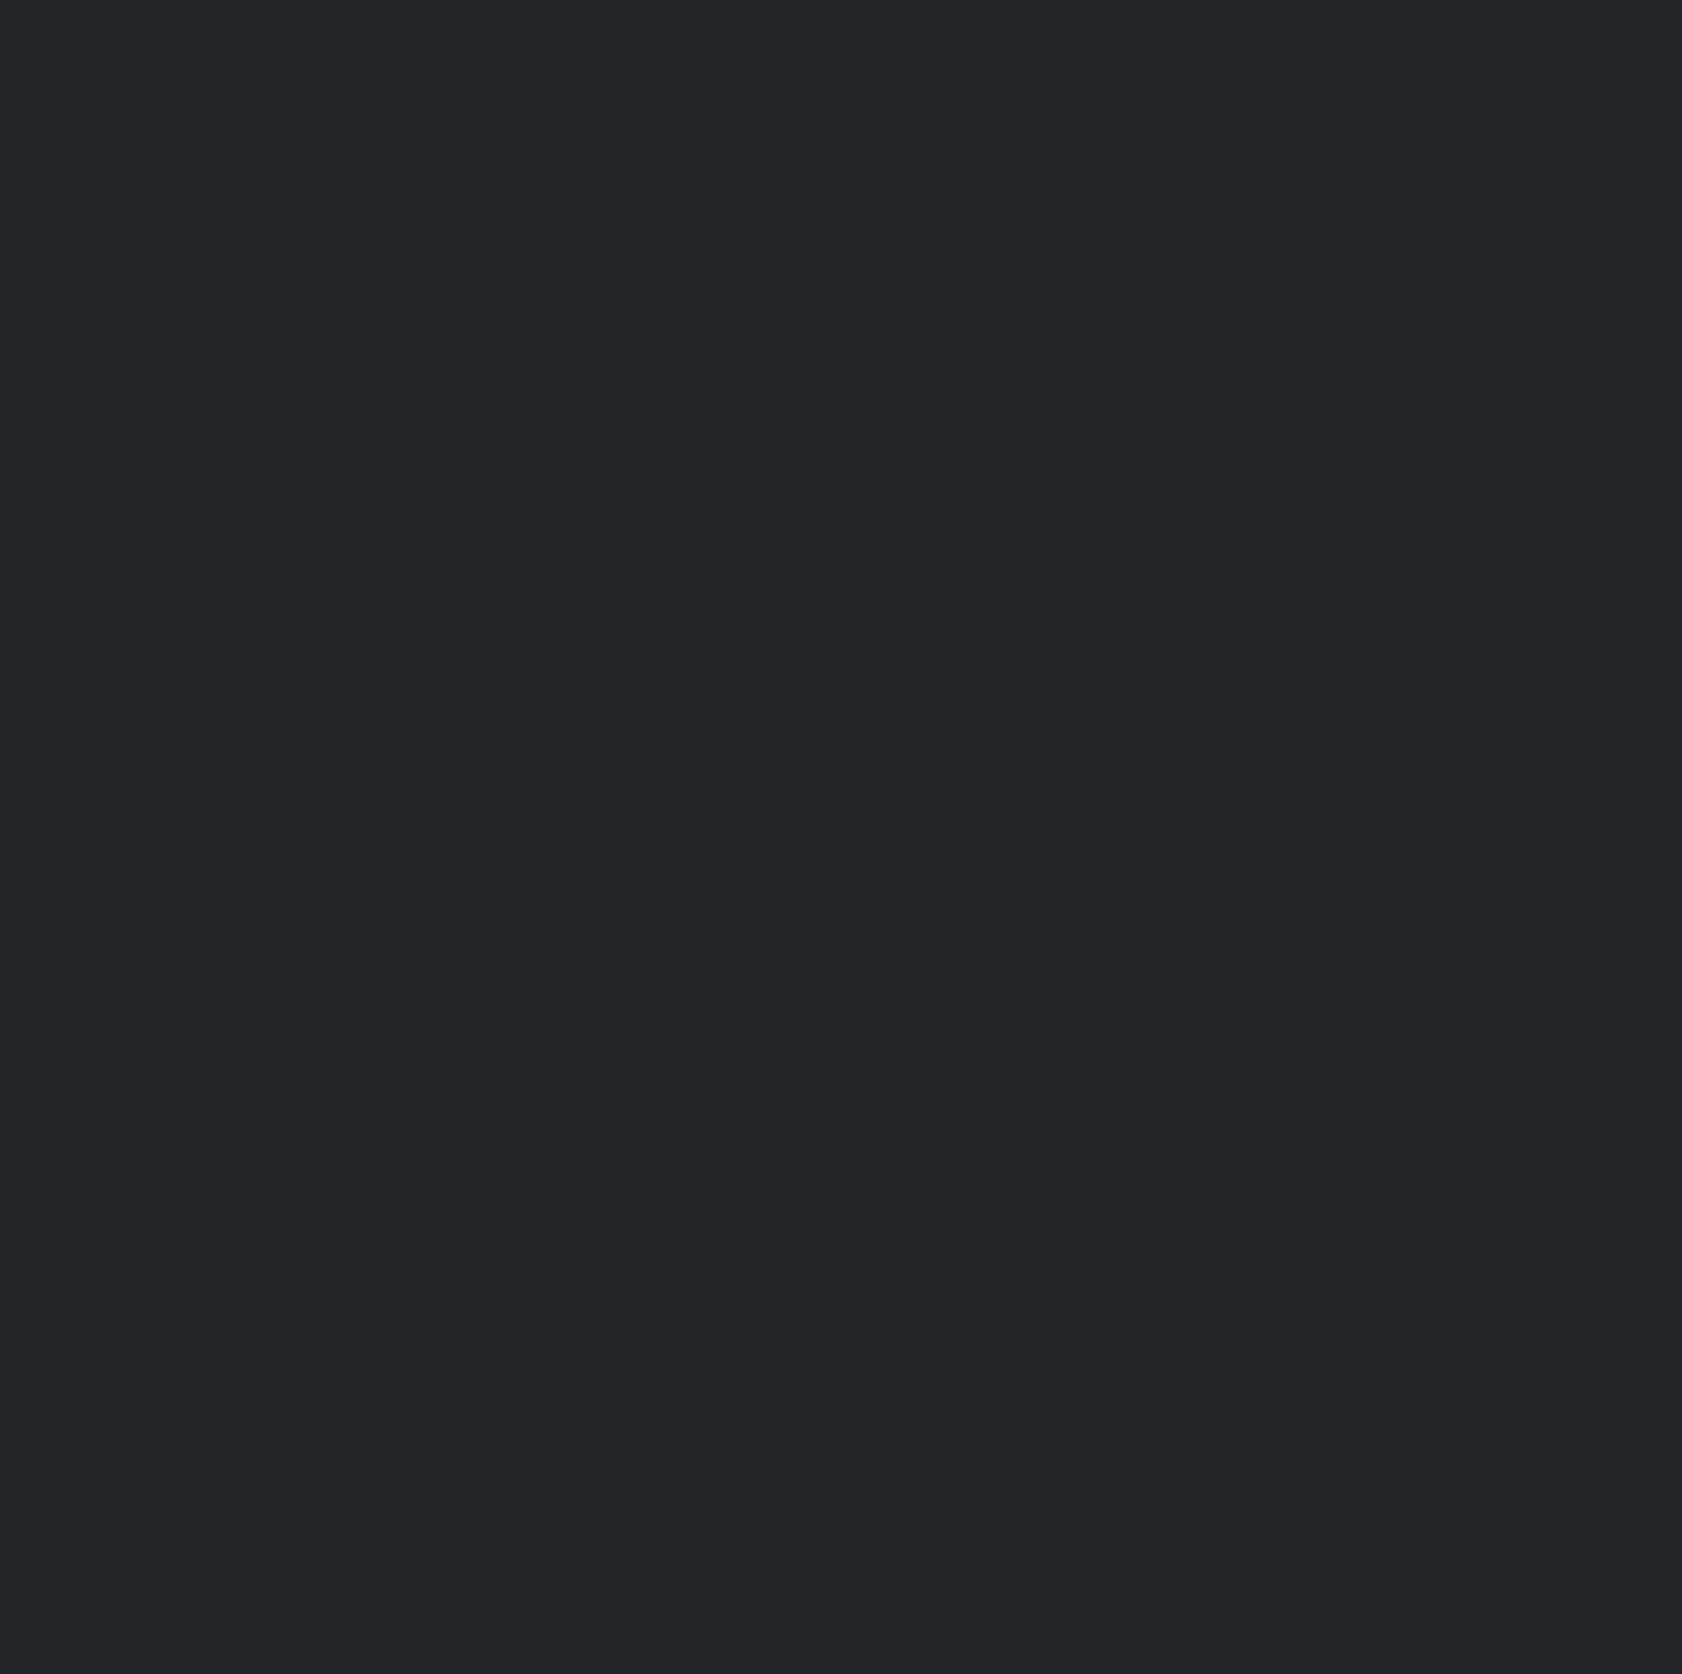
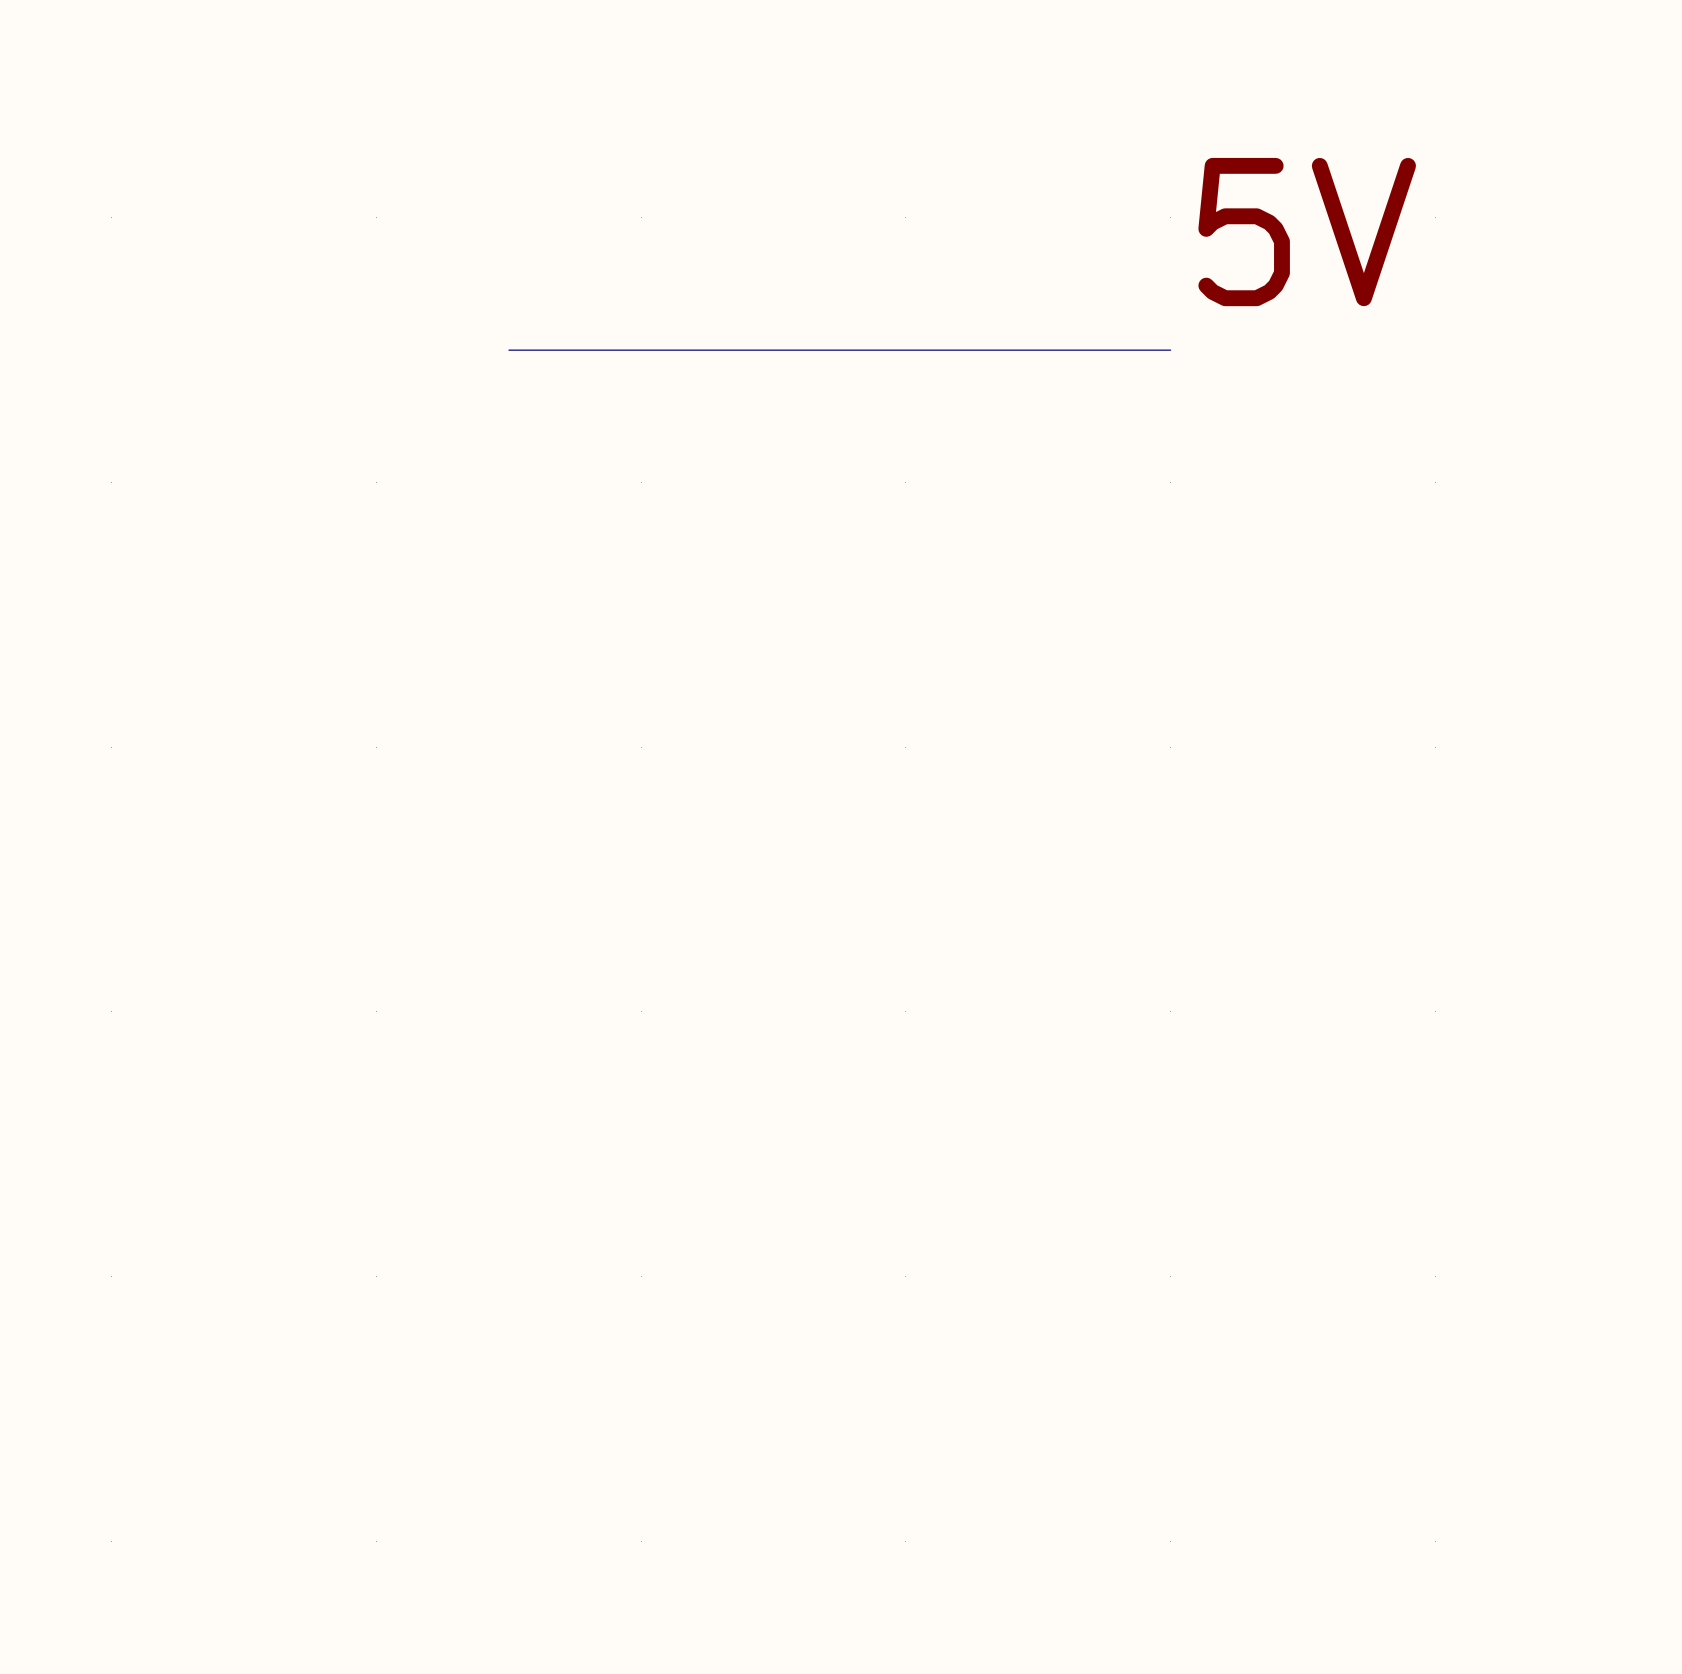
label: none -> 5V (1307, 232)
wire: none -> (508, 350) (1170, 350)

